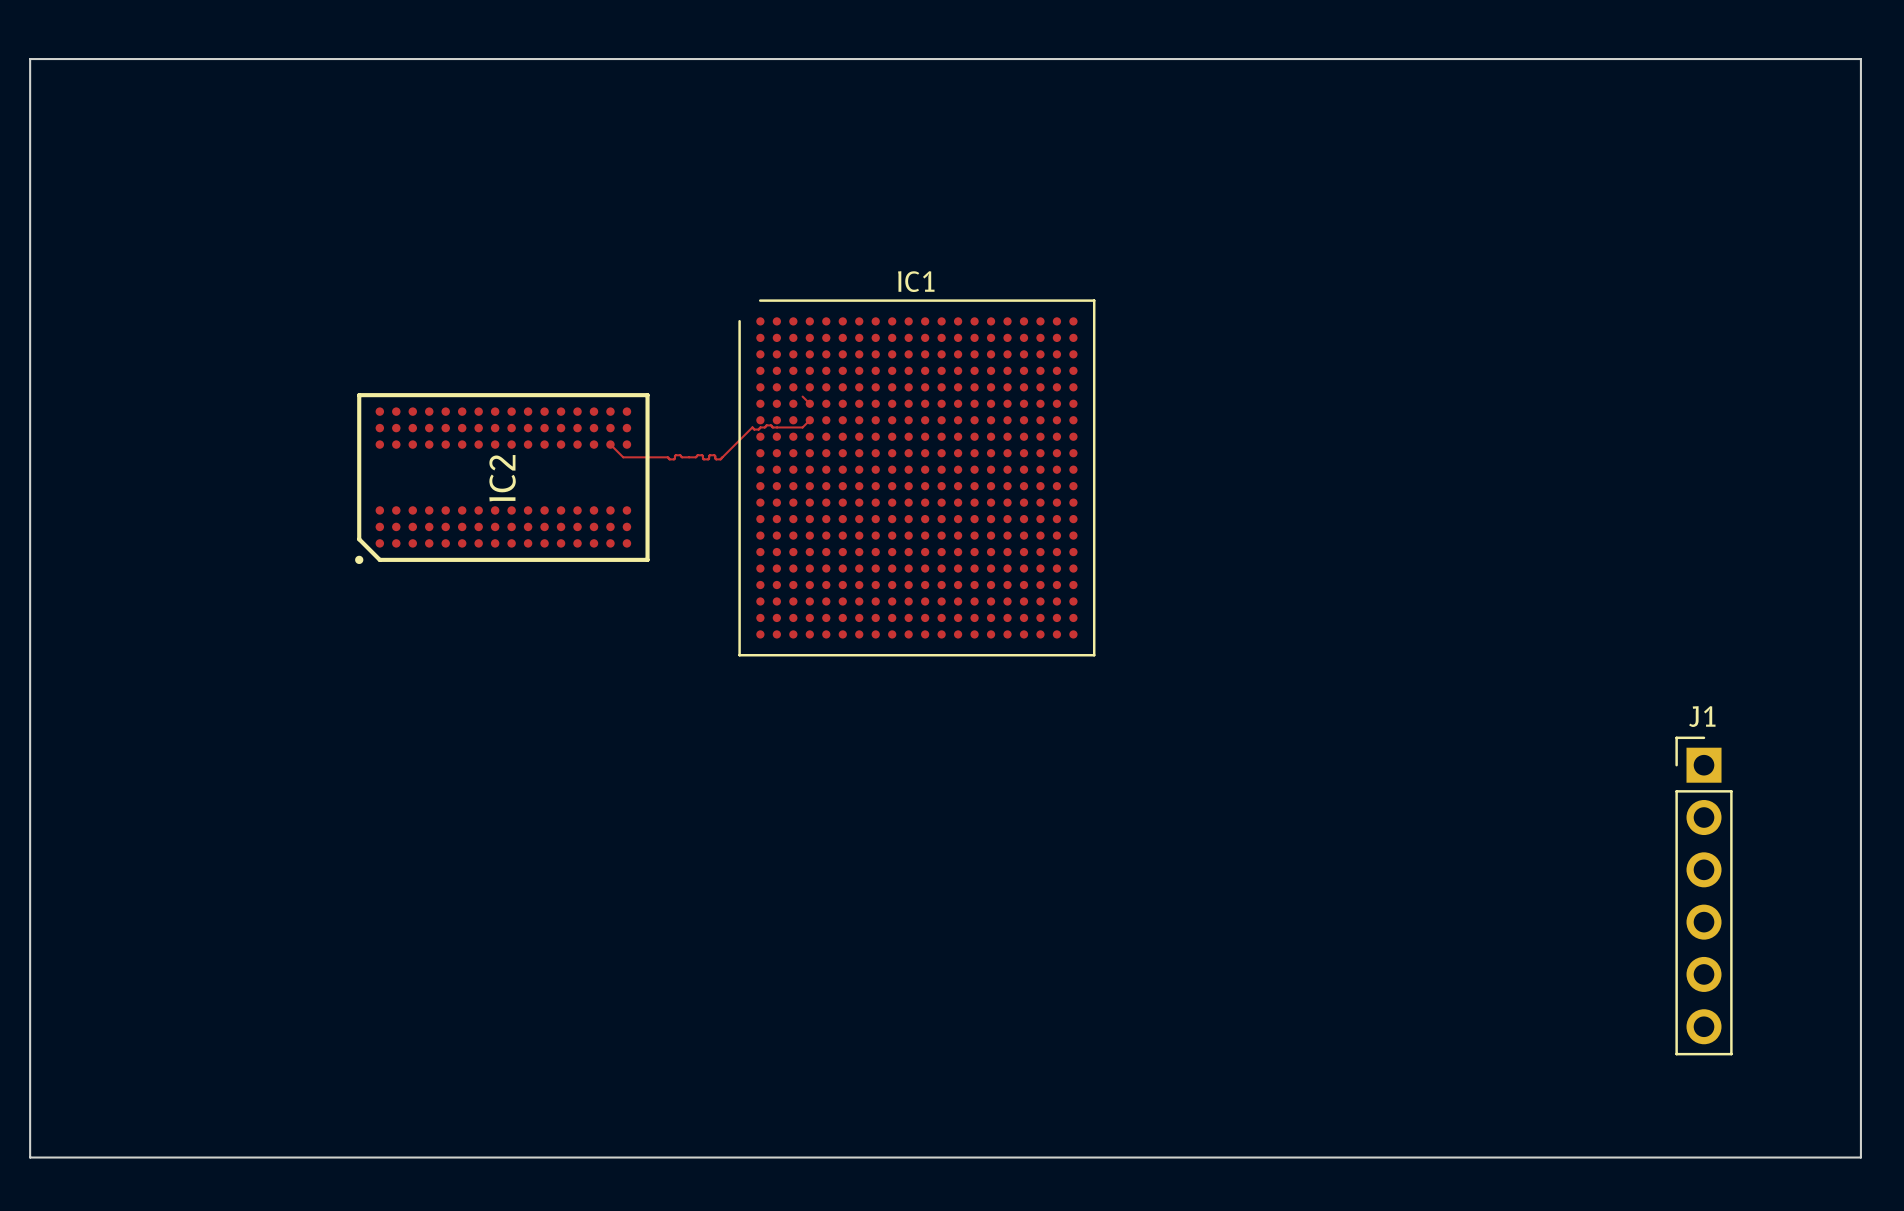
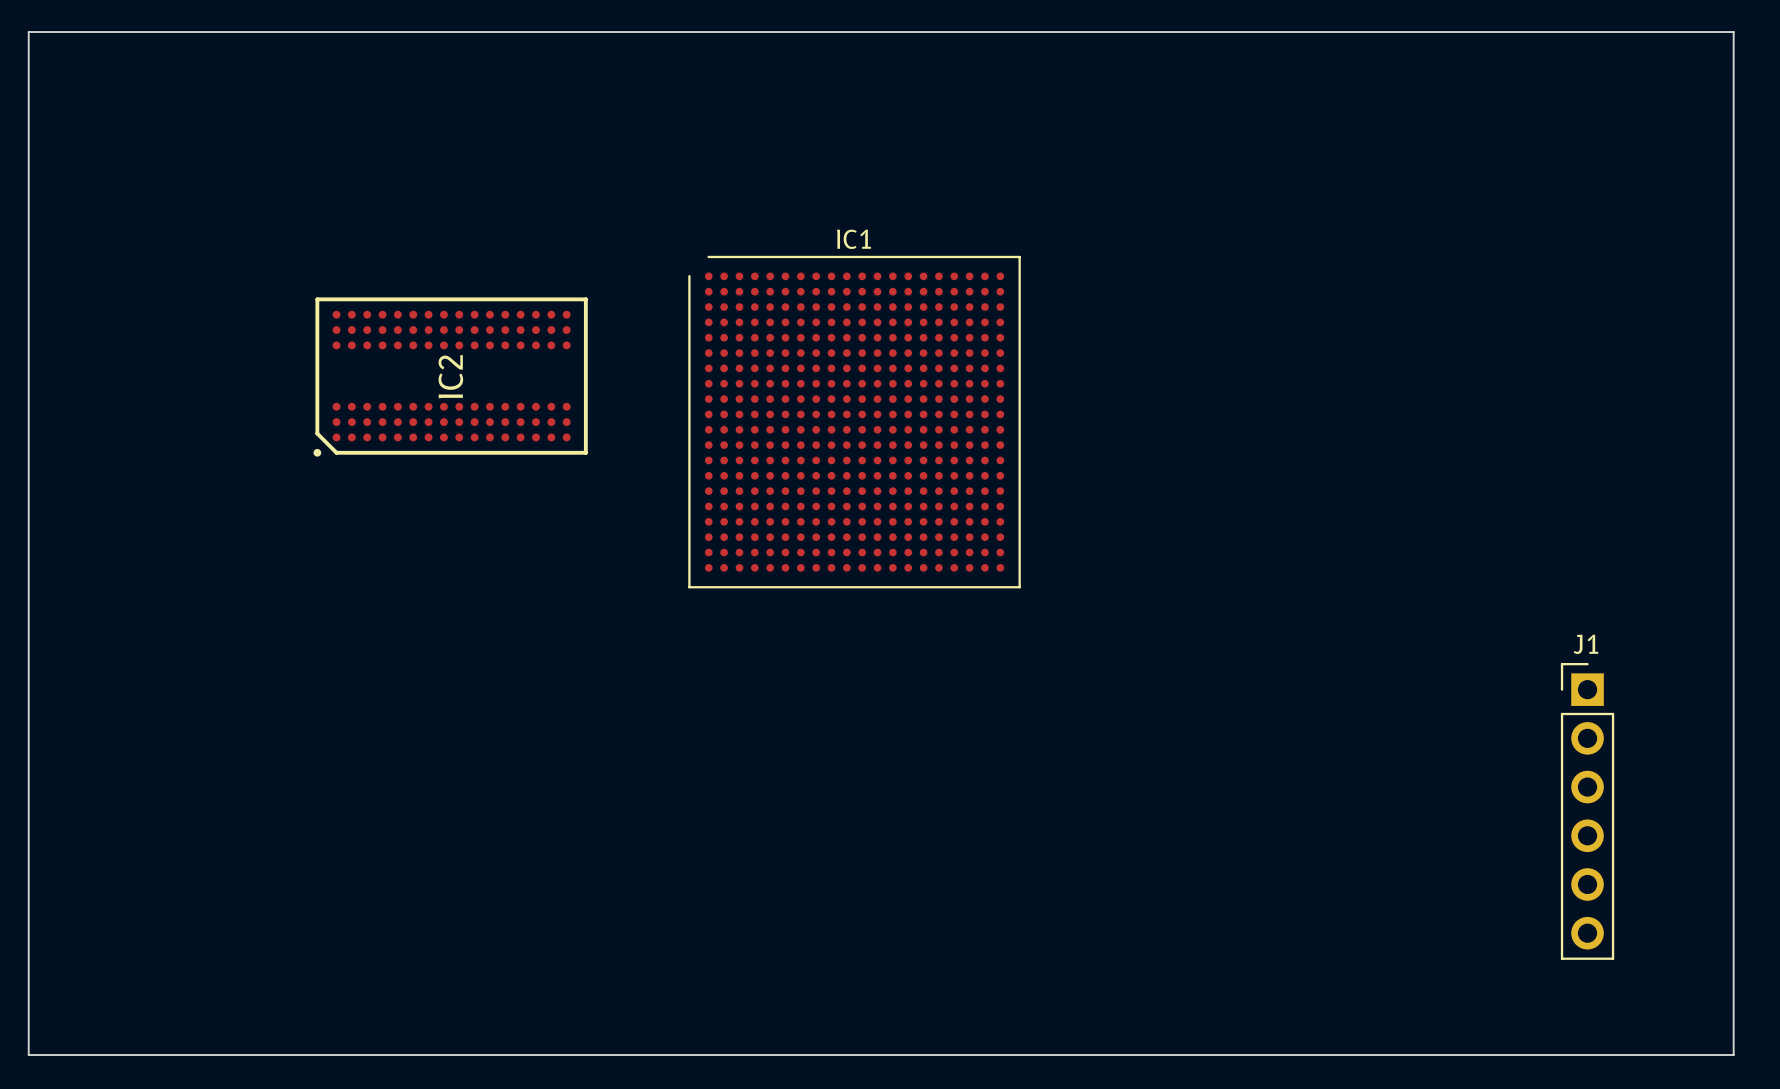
track: (802, 396) (809, 403) -> none
track: (809, 420) (802, 427) (772, 427) (766, 425) (758, 429) (752, 427) (720, 459) (715, 459) (714, 455) (709, 455) (708, 459) (703, 459) (701, 455) (695, 457) (675, 455) (673, 459) (667, 457) (623, 457) (610, 444) -> none
IC2 position: (502, 478) -> (450, 377)

